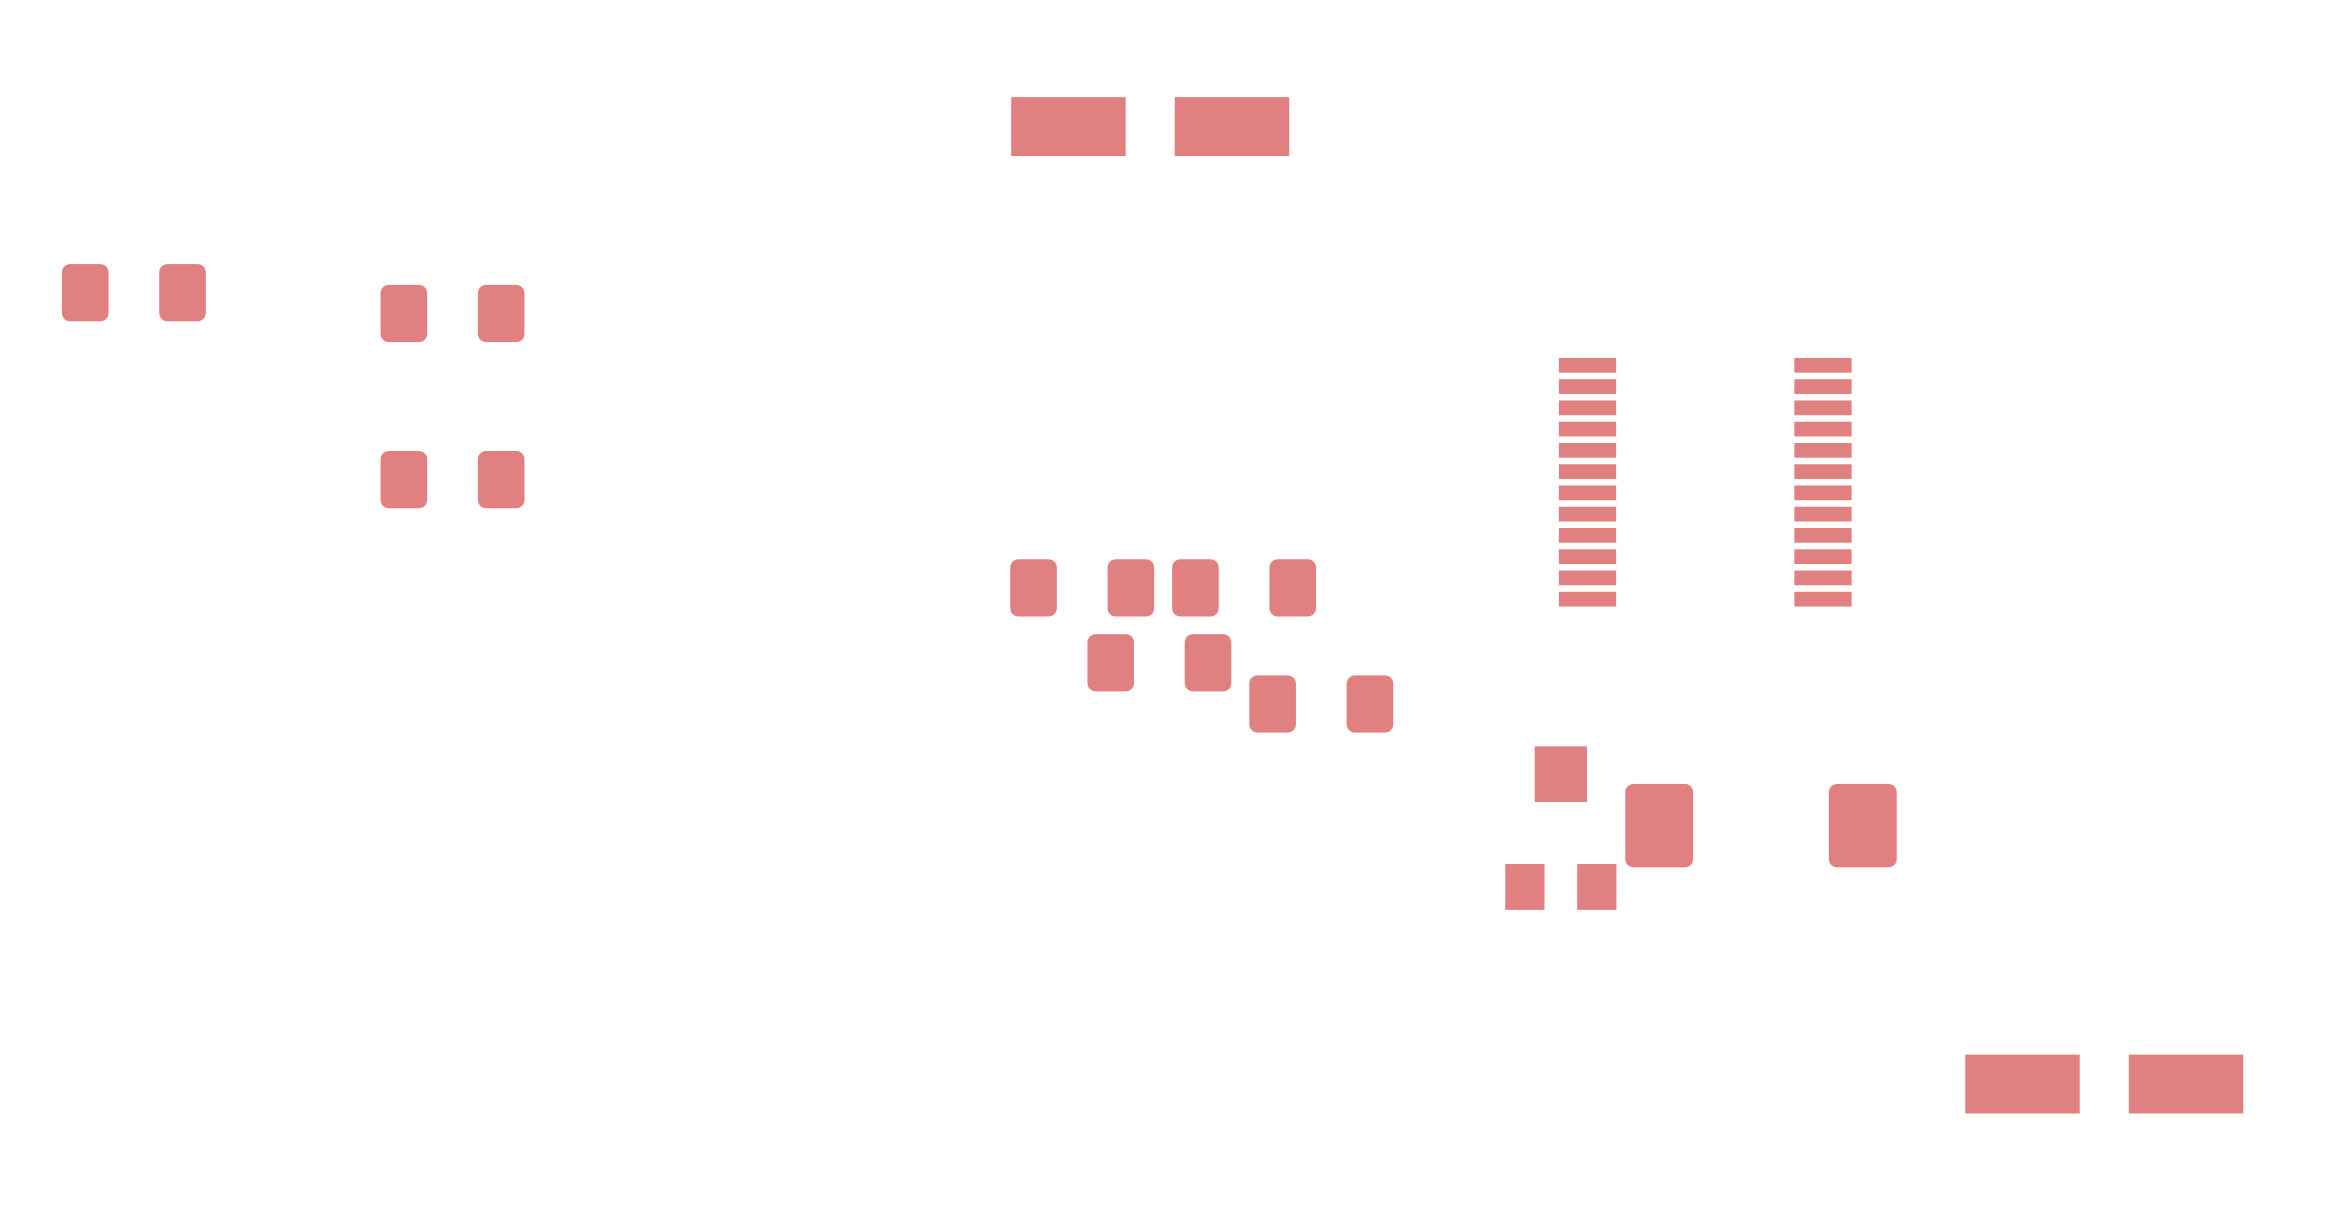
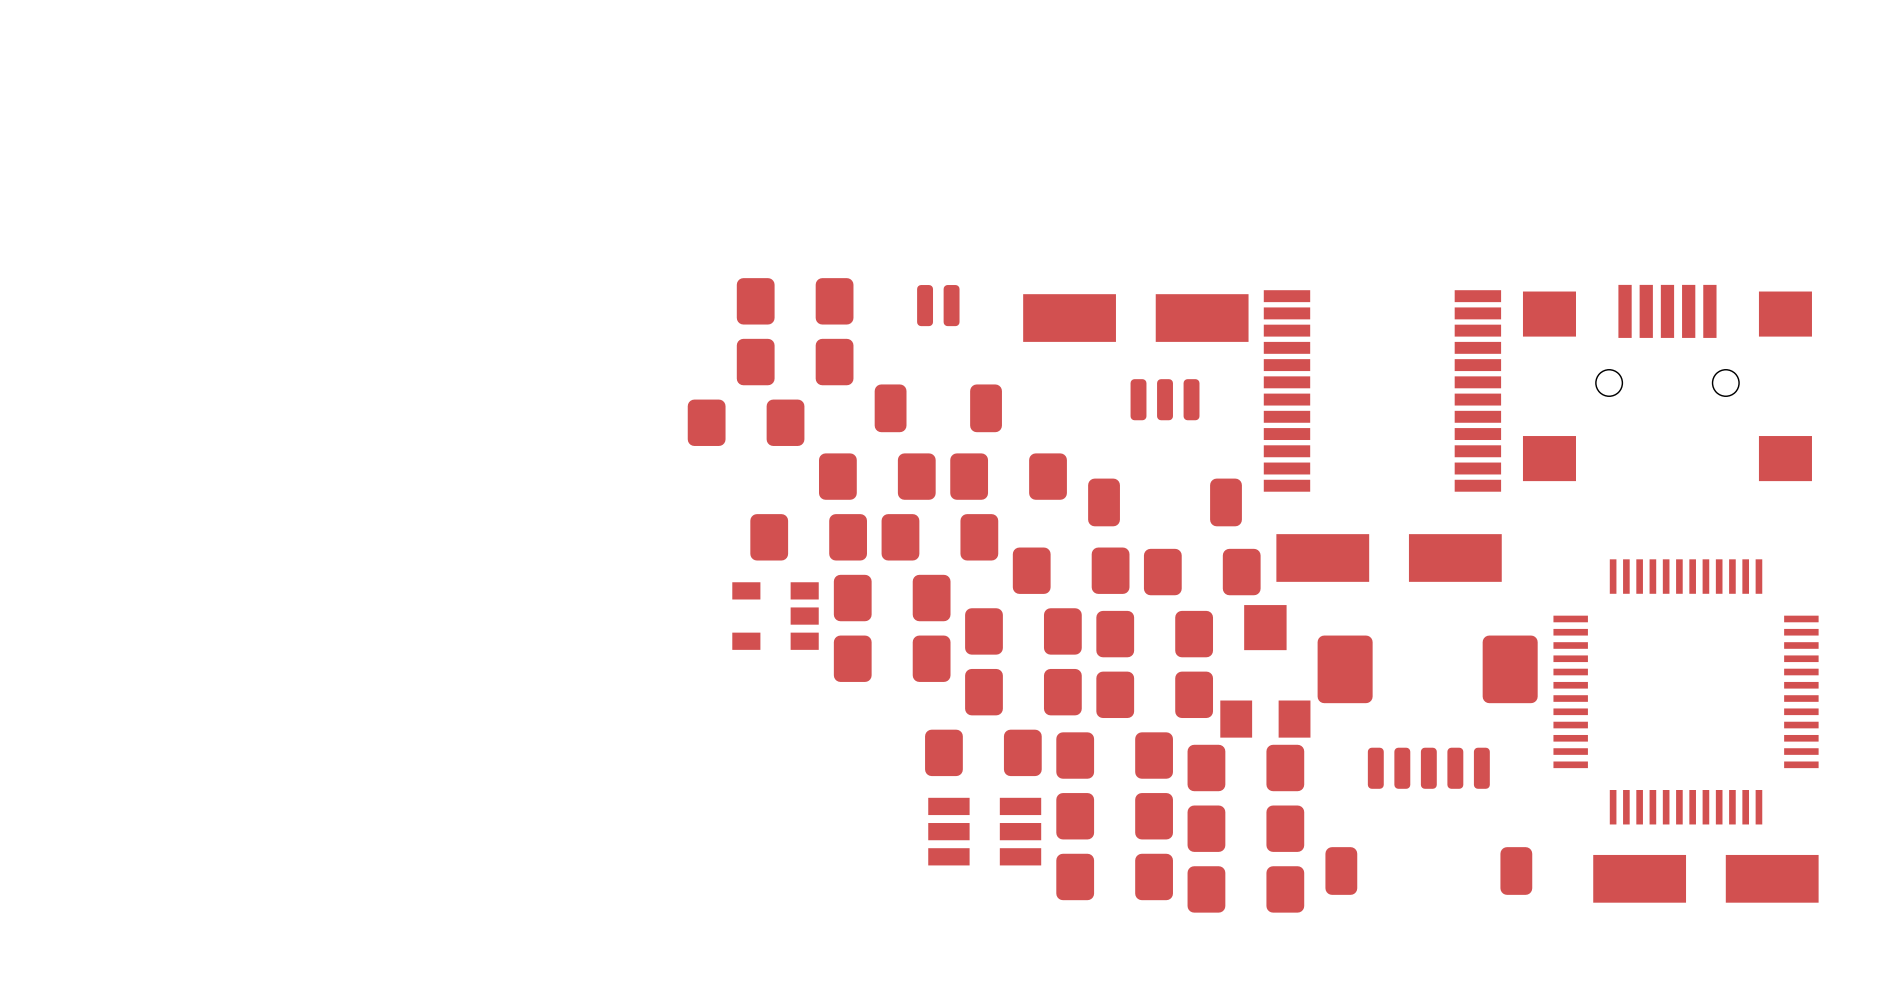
part position: (1150, 126) -> (1135, 318)
part: (133, 292) -> none
part: (452, 313) -> none
part: none -> (795, 301)
part: none -> (938, 358)
part: none -> (795, 362)
part: none -> (1667, 382)
part: (452, 479) -> none
part: none -> (746, 422)
part: none -> (1165, 452)
part: none -> (808, 537)
part: none -> (1389, 557)
part: none -> (1202, 572)
part: none -> (892, 598)
part: none -> (775, 616)
part: none -> (1023, 631)
part: none -> (1154, 634)
part: none -> (892, 658)
part: none -> (1023, 692)
part: none -> (1686, 691)
part: none -> (1154, 694)
part: none -> (983, 752)
part: none -> (1114, 755)
part: none -> (1245, 767)
part: none -> (1114, 816)
part: none -> (1428, 821)
part: none -> (1245, 828)
part: none -> (984, 831)
part: none -> (1114, 876)
part: none -> (1245, 889)

